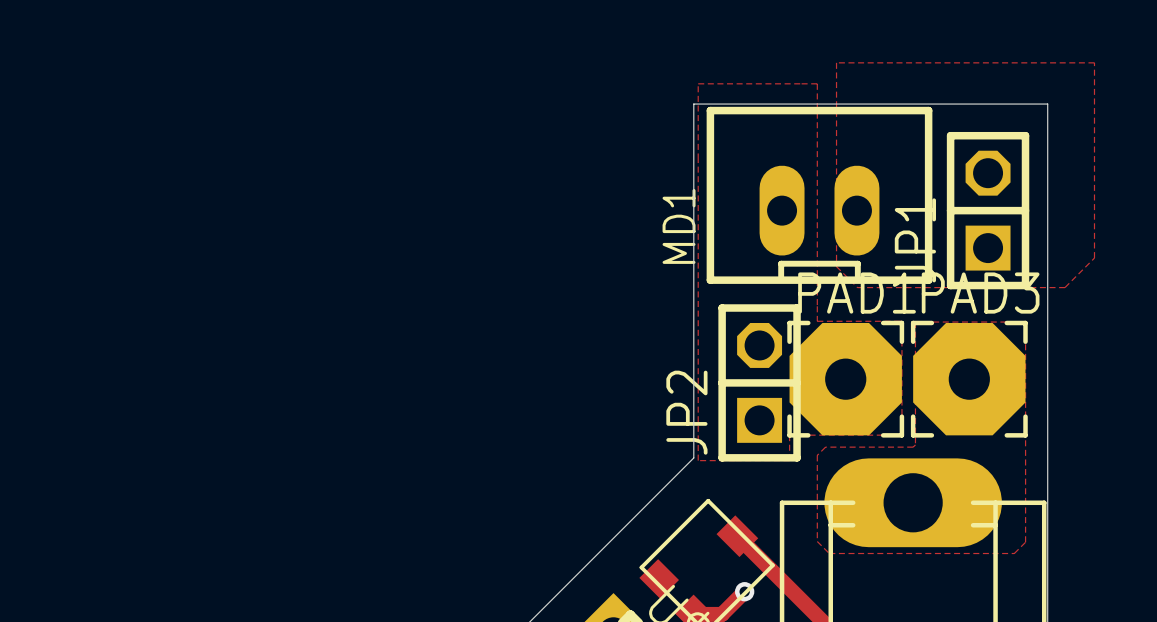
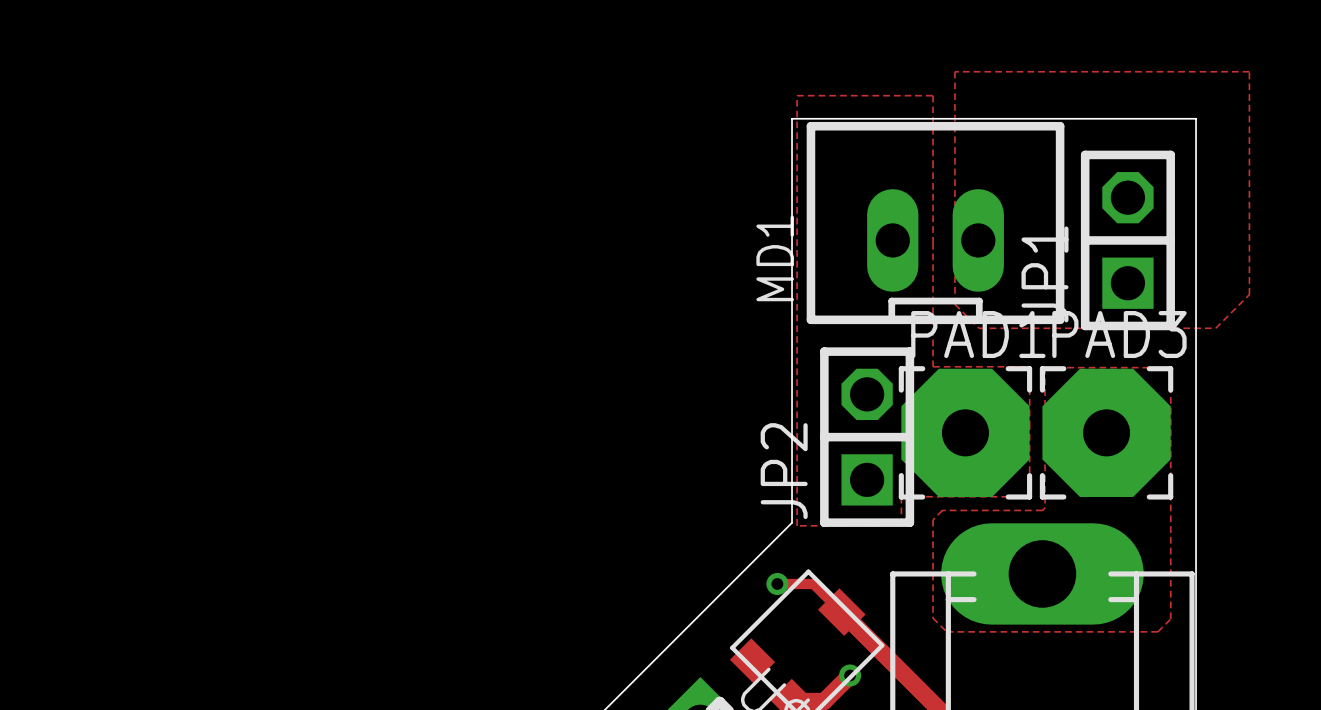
track: none -> (777, 583) (813, 583) (841, 612)
via: none -> (777, 583)

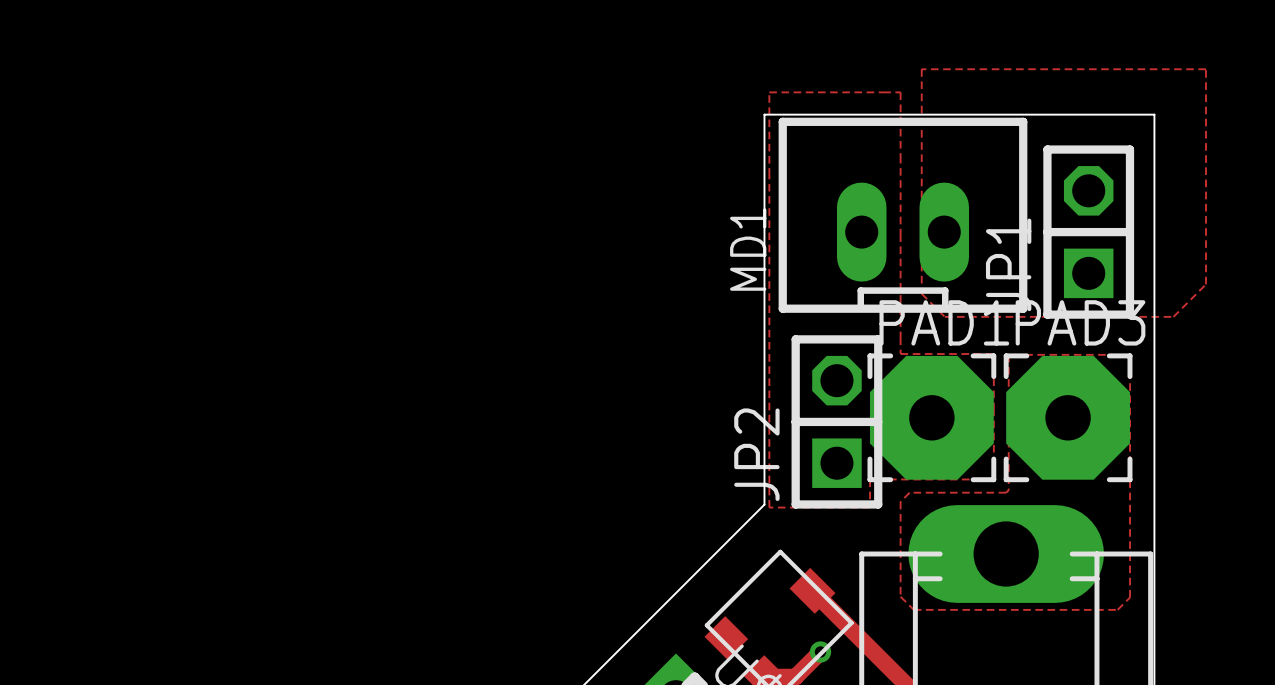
track: (777, 583) (813, 583) (841, 612) -> none
via: (777, 583) -> none

